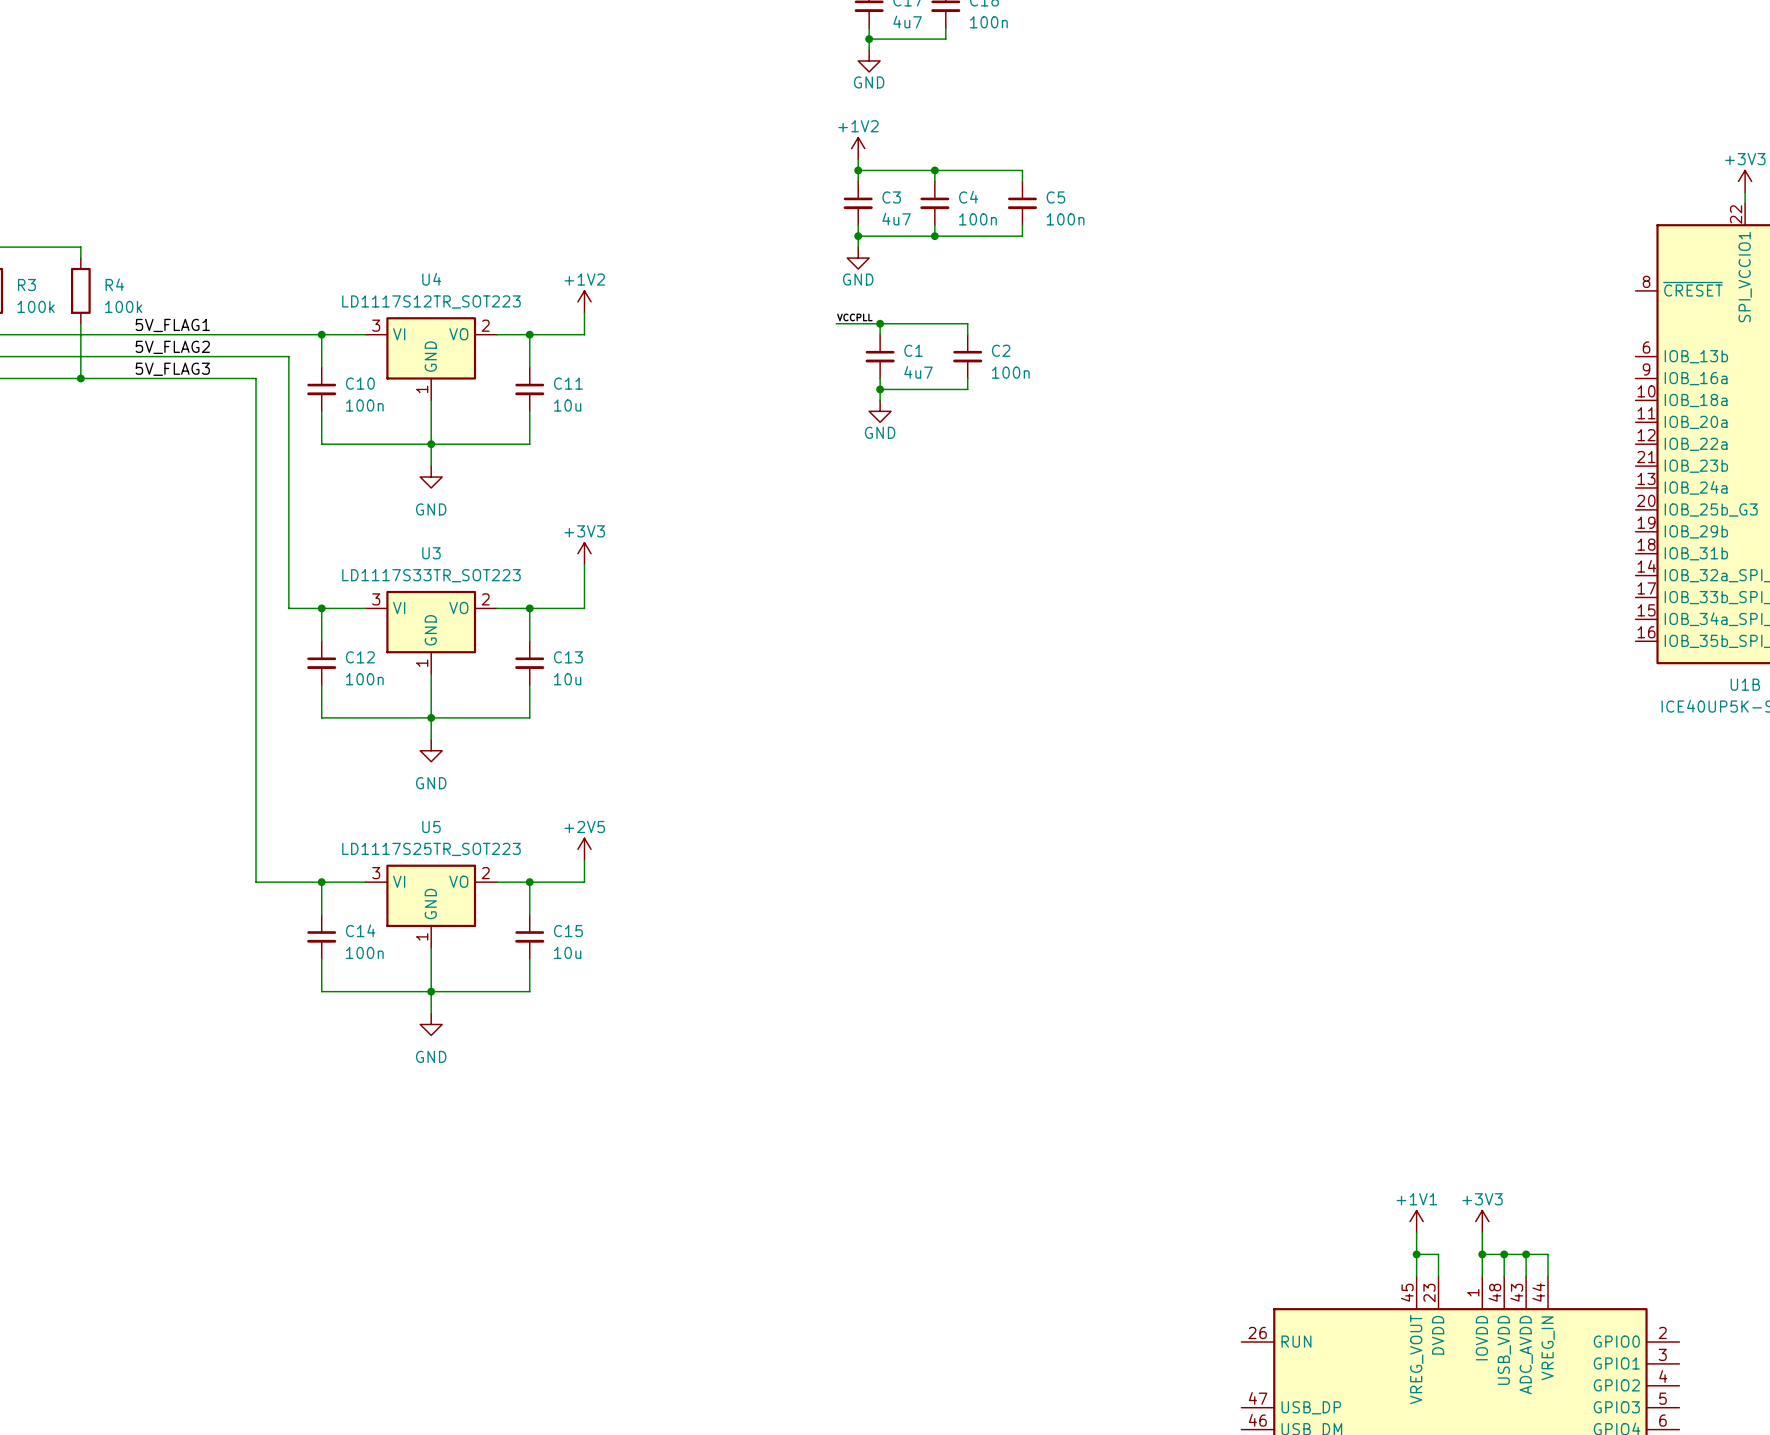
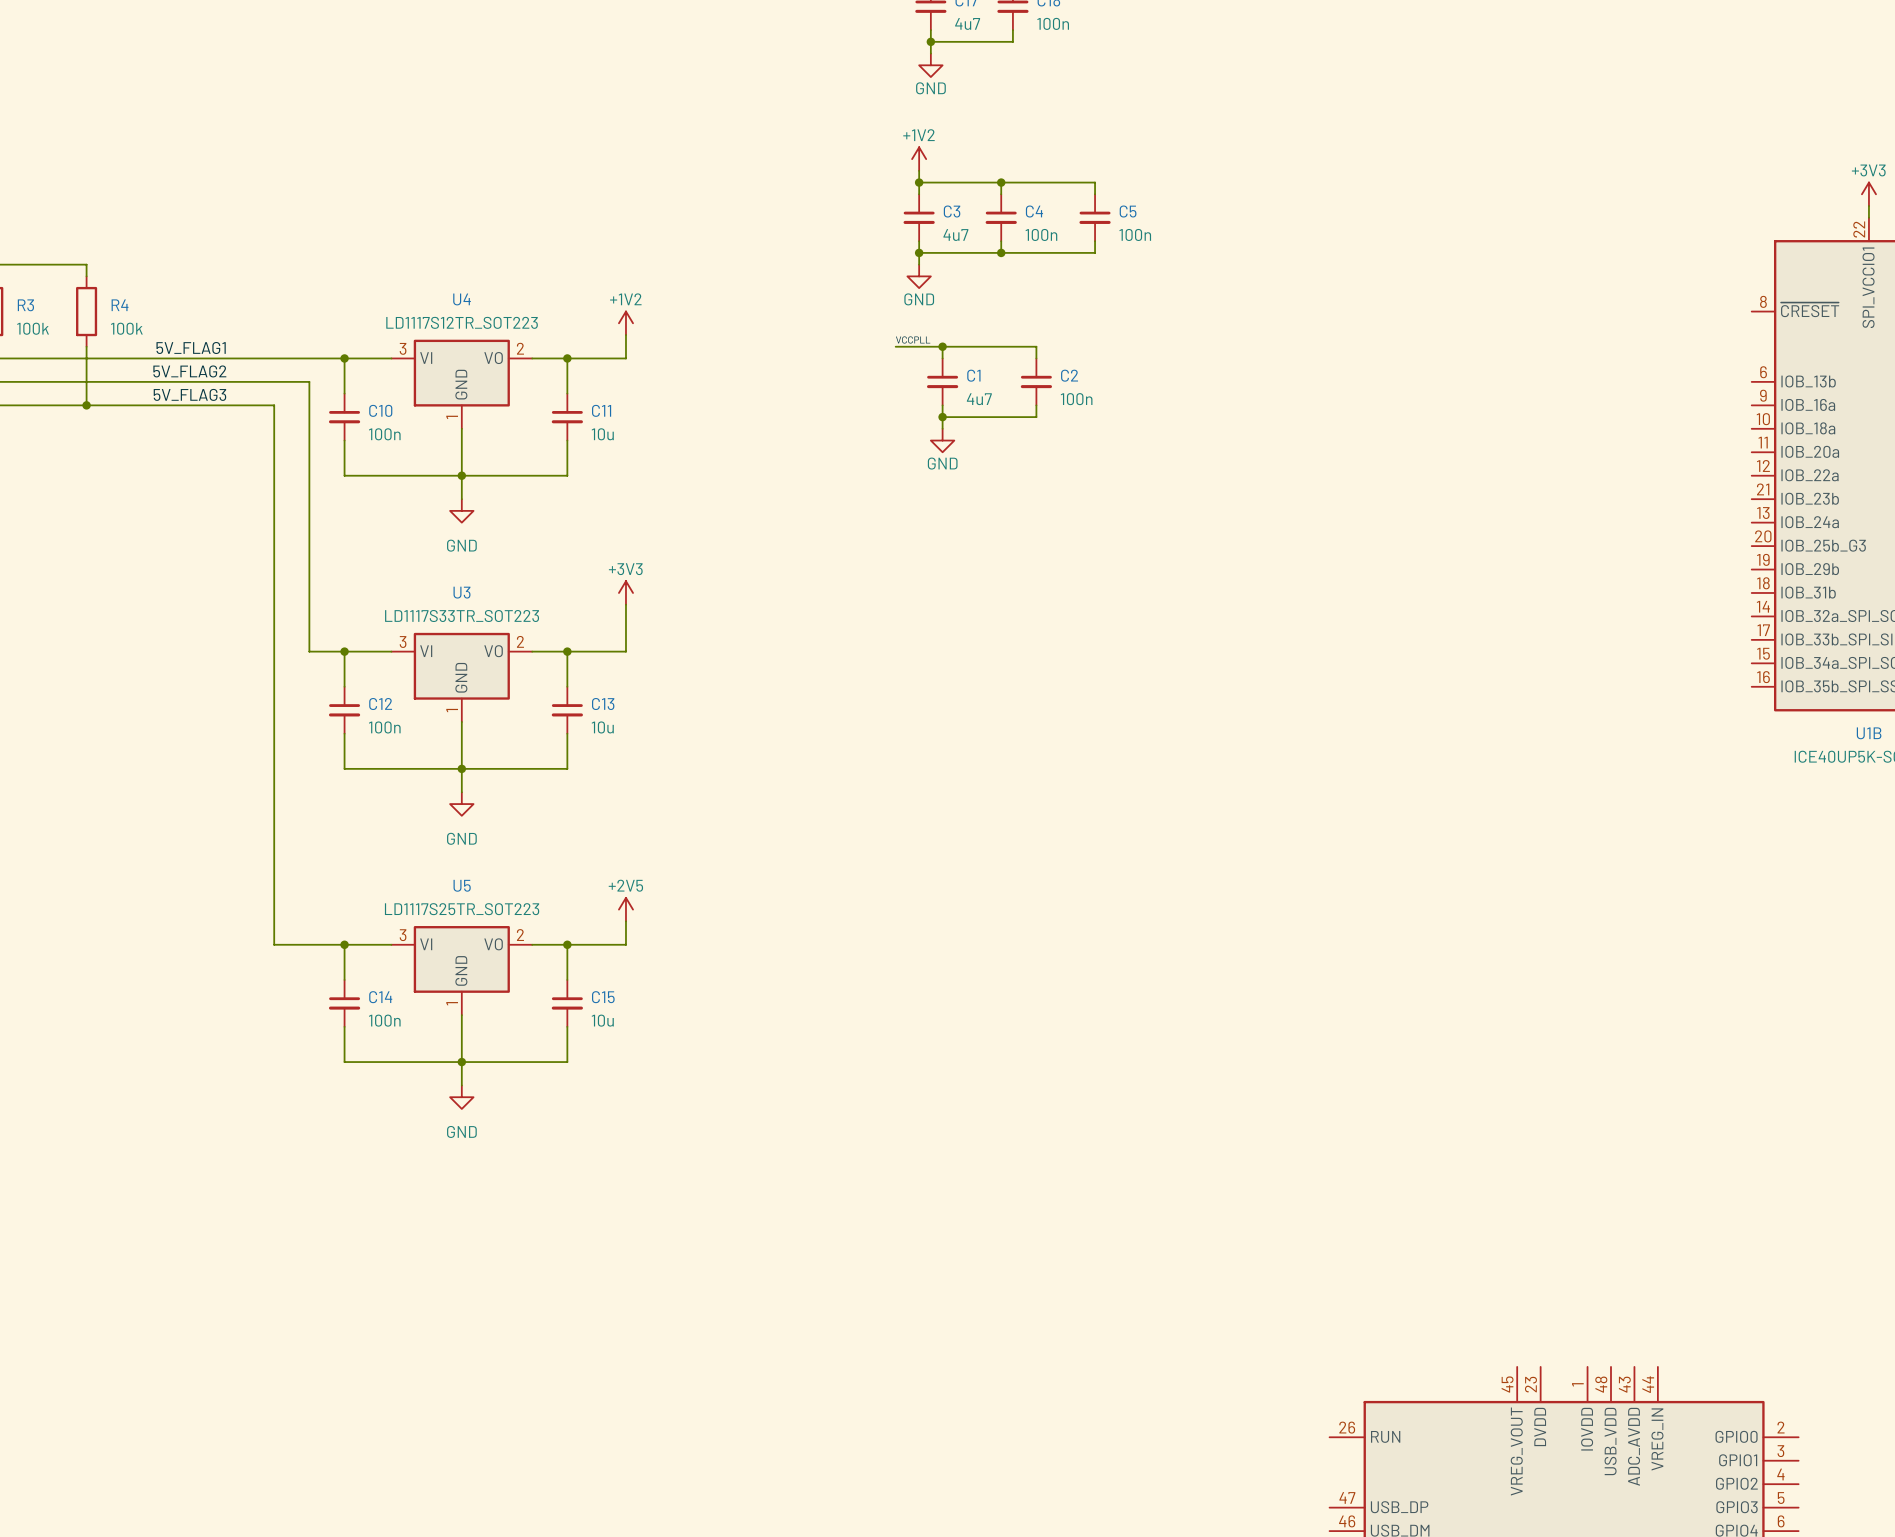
power symbol: +1V1 (1416, 1221) -> none
power symbol: +3V3 (1482, 1221) -> none
wire: (1416, 1232) (1416, 1276) -> none
wire: (1482, 1232) (1482, 1276) -> none
wire: (1416, 1254) (1438, 1254) (1438, 1276) -> none
junction: (1416, 1254) -> none
wire: (1482, 1254) (1548, 1254) (1548, 1276) -> none
junction: (1482, 1254) -> none
wire: (1504, 1254) (1504, 1276) -> none
junction: (1504, 1254) -> none
wire: (1526, 1254) (1526, 1276) -> none
junction: (1526, 1254) -> none

